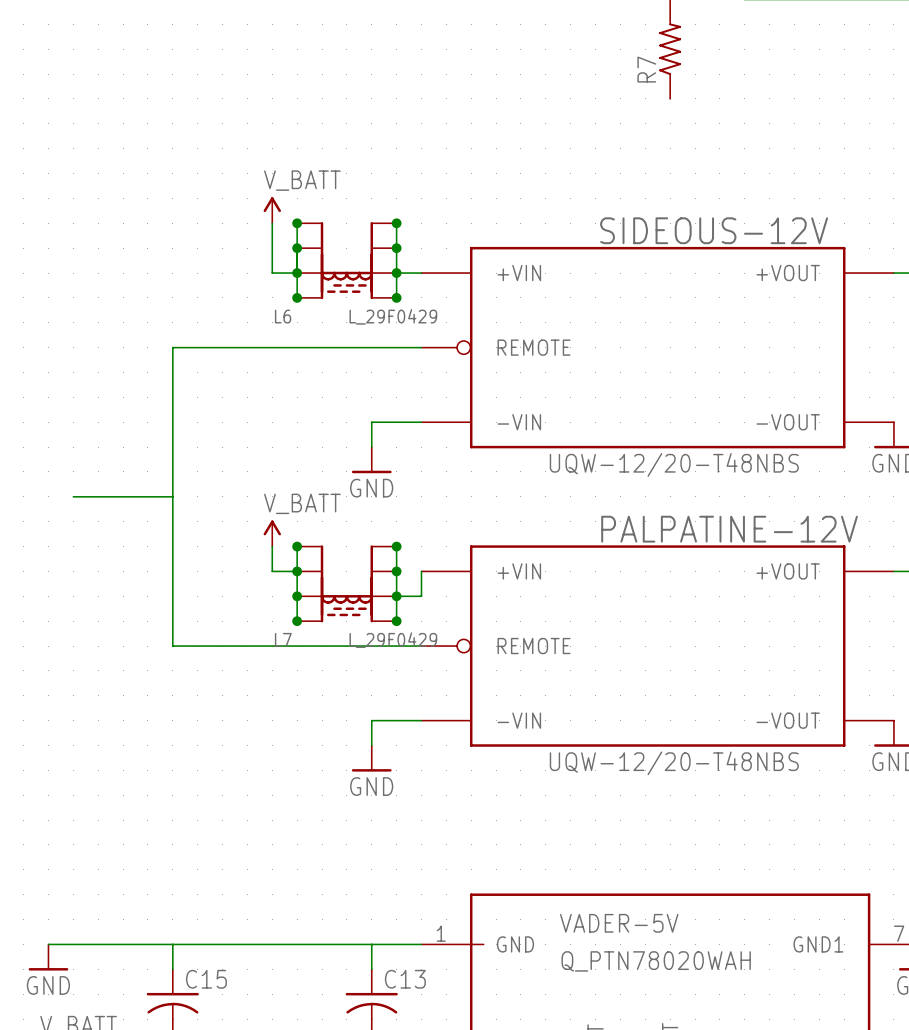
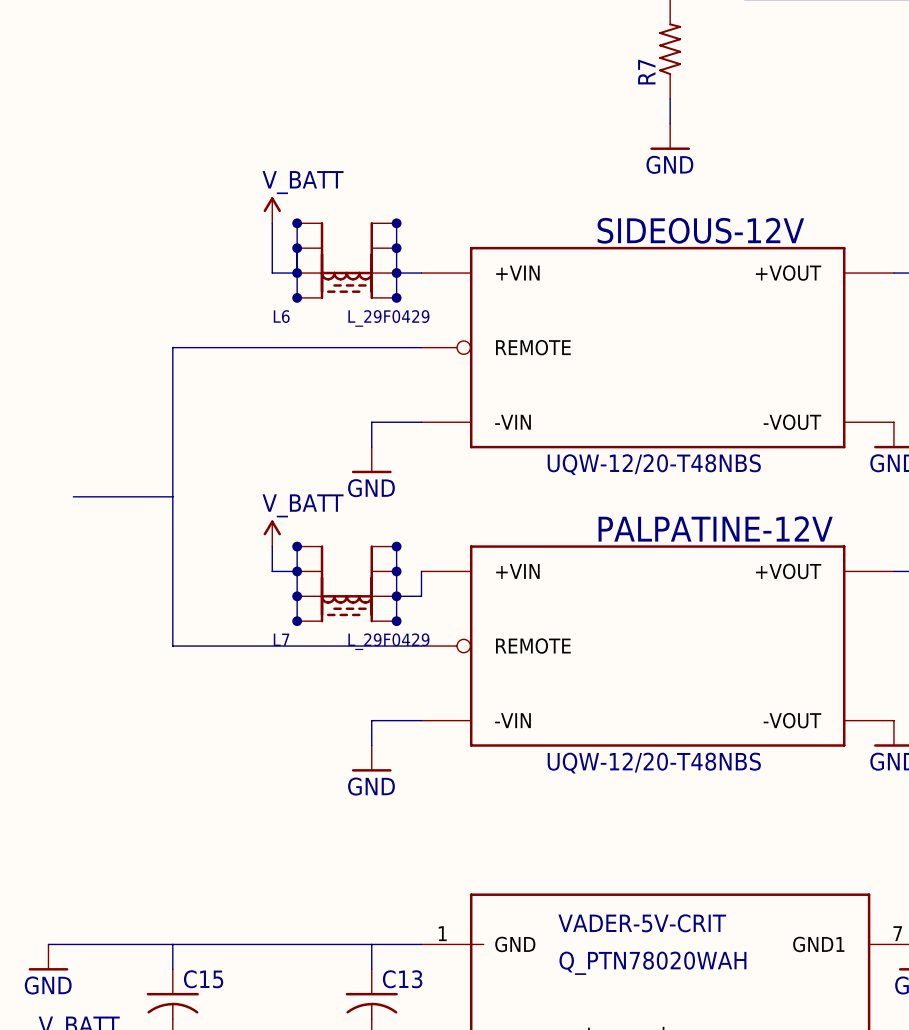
wire: none -> (670, 98) (670, 123)
power symbol: none -> GND (670, 136)
VADER-5V name: VADER-5V (619, 923) -> VADER-5V-CRIT (642, 923)

